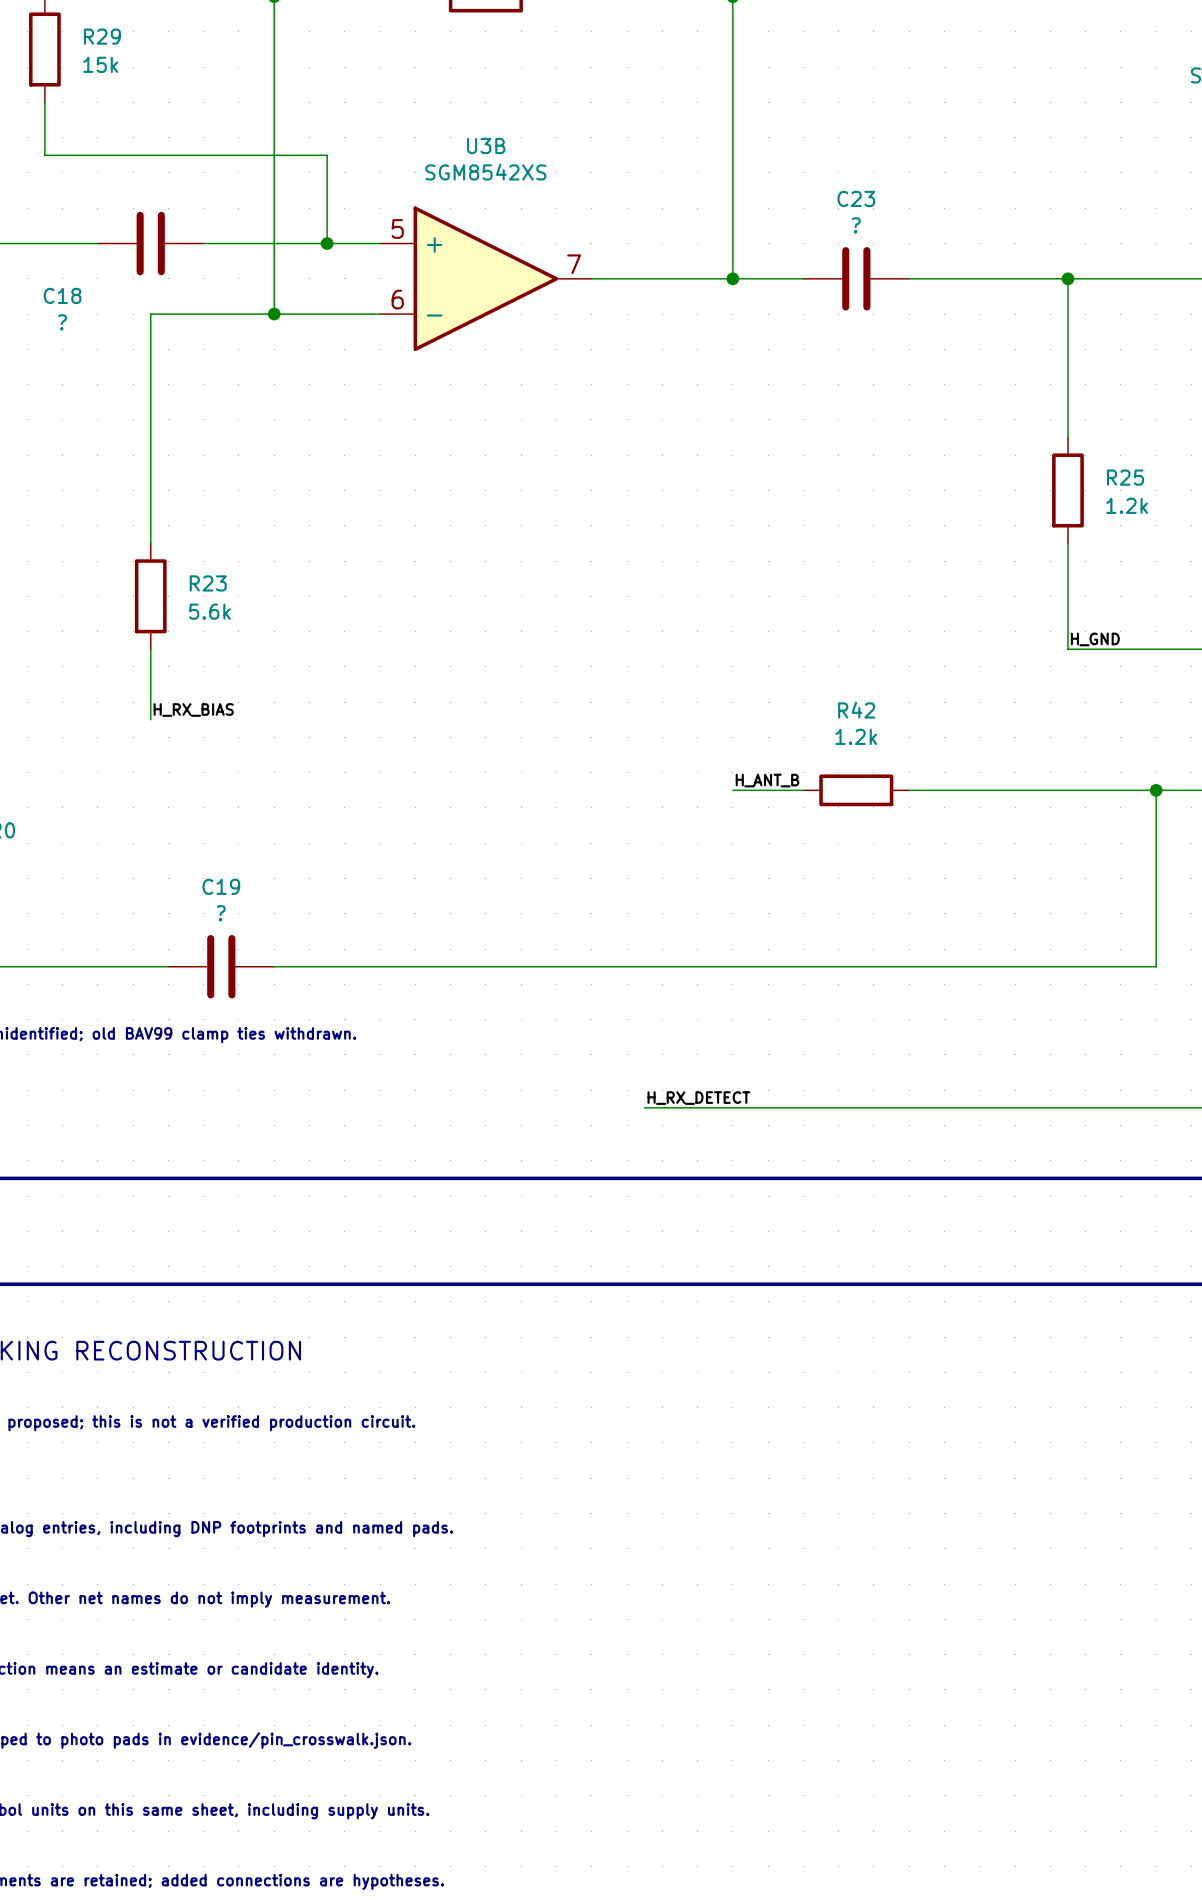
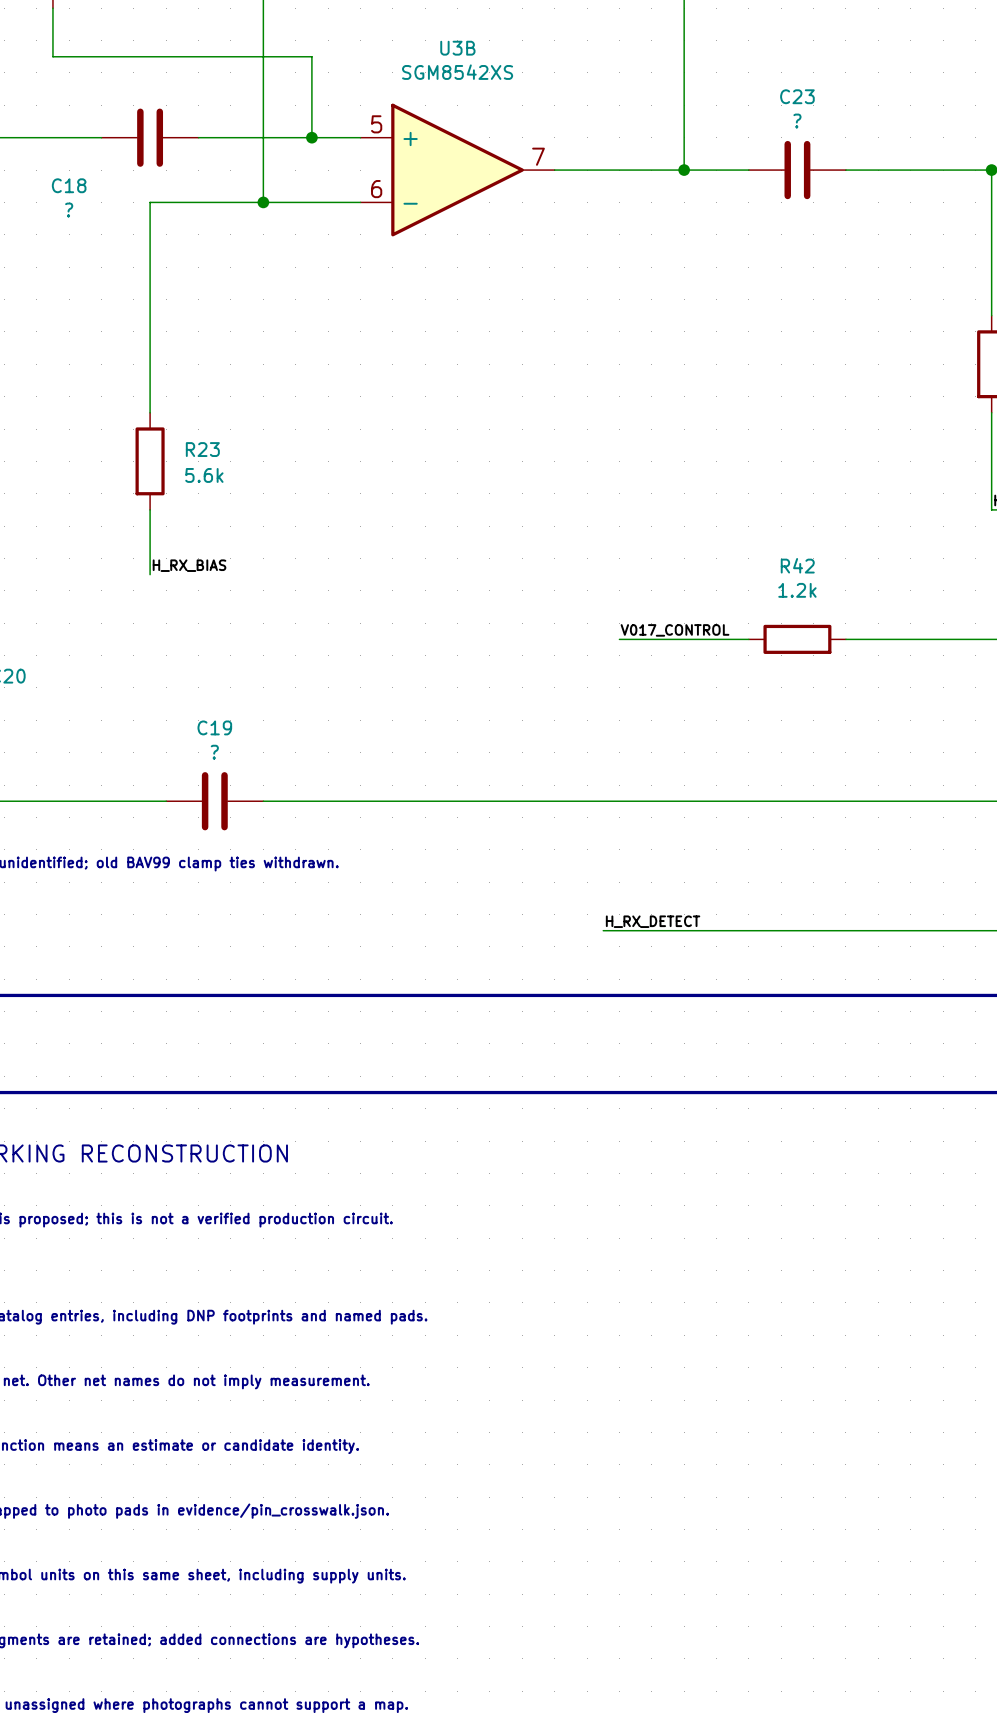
label: none -> V017_CONTROL (675, 630)
label: H_ANT_B (767, 780) -> none
wire: none -> (619, 639) (684, 639)

